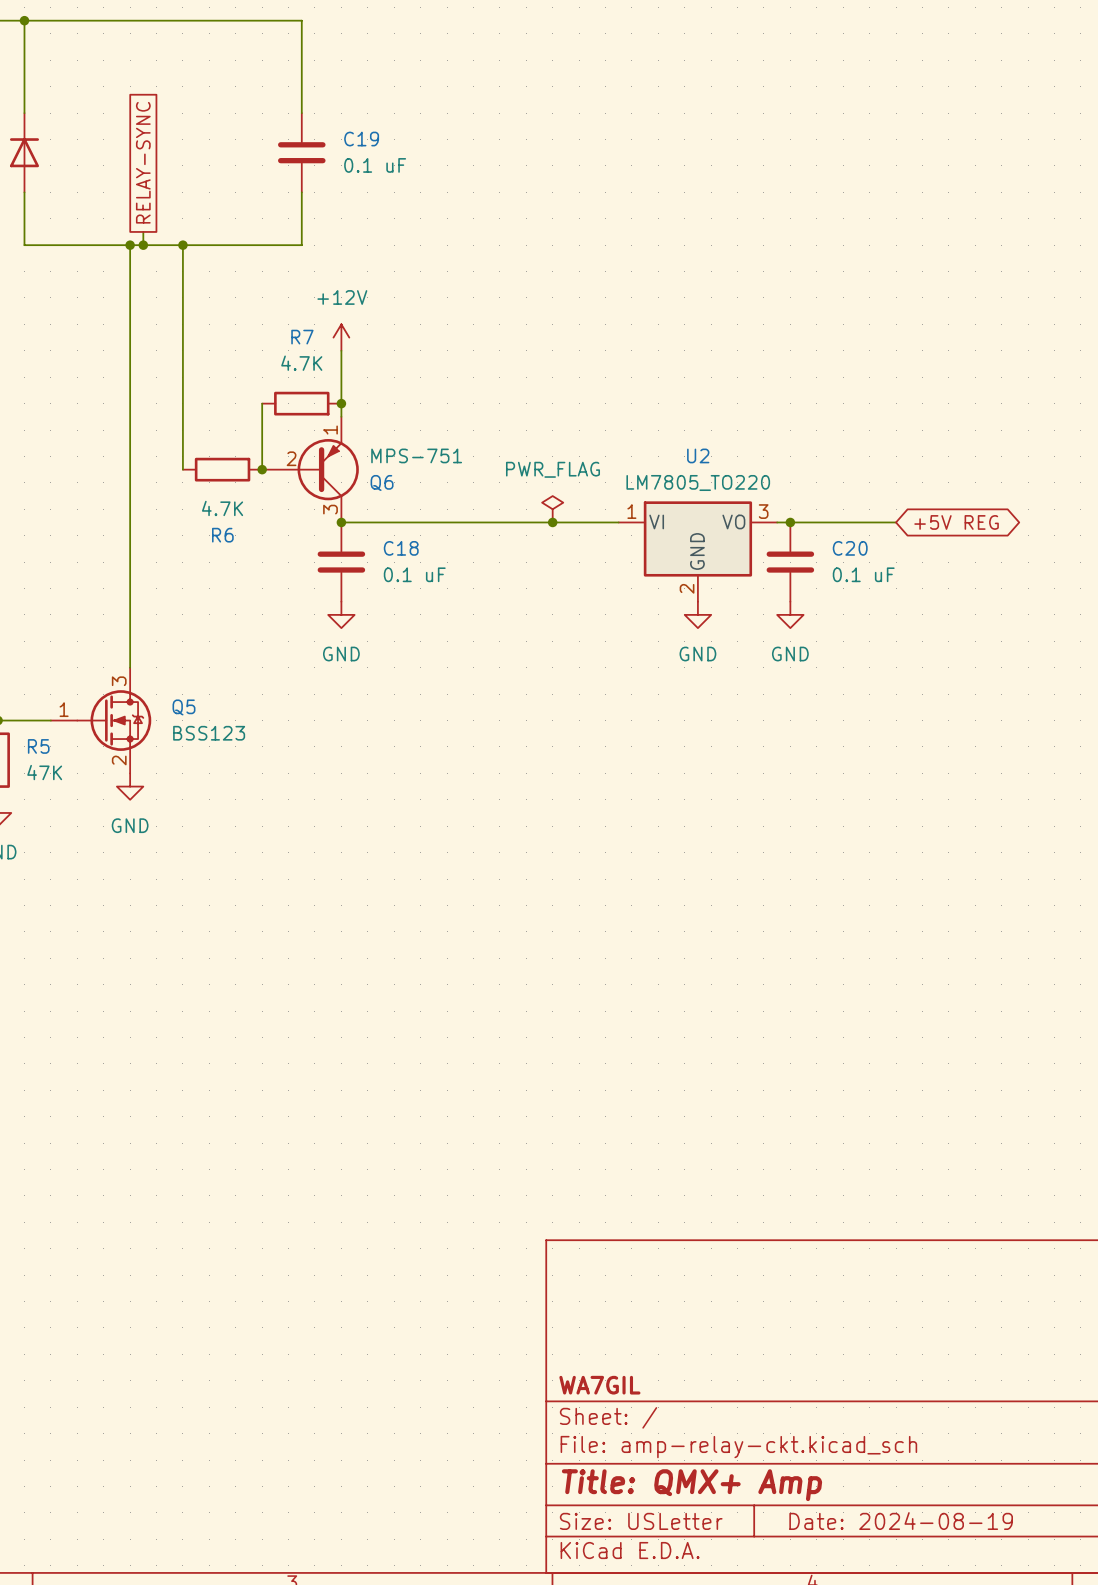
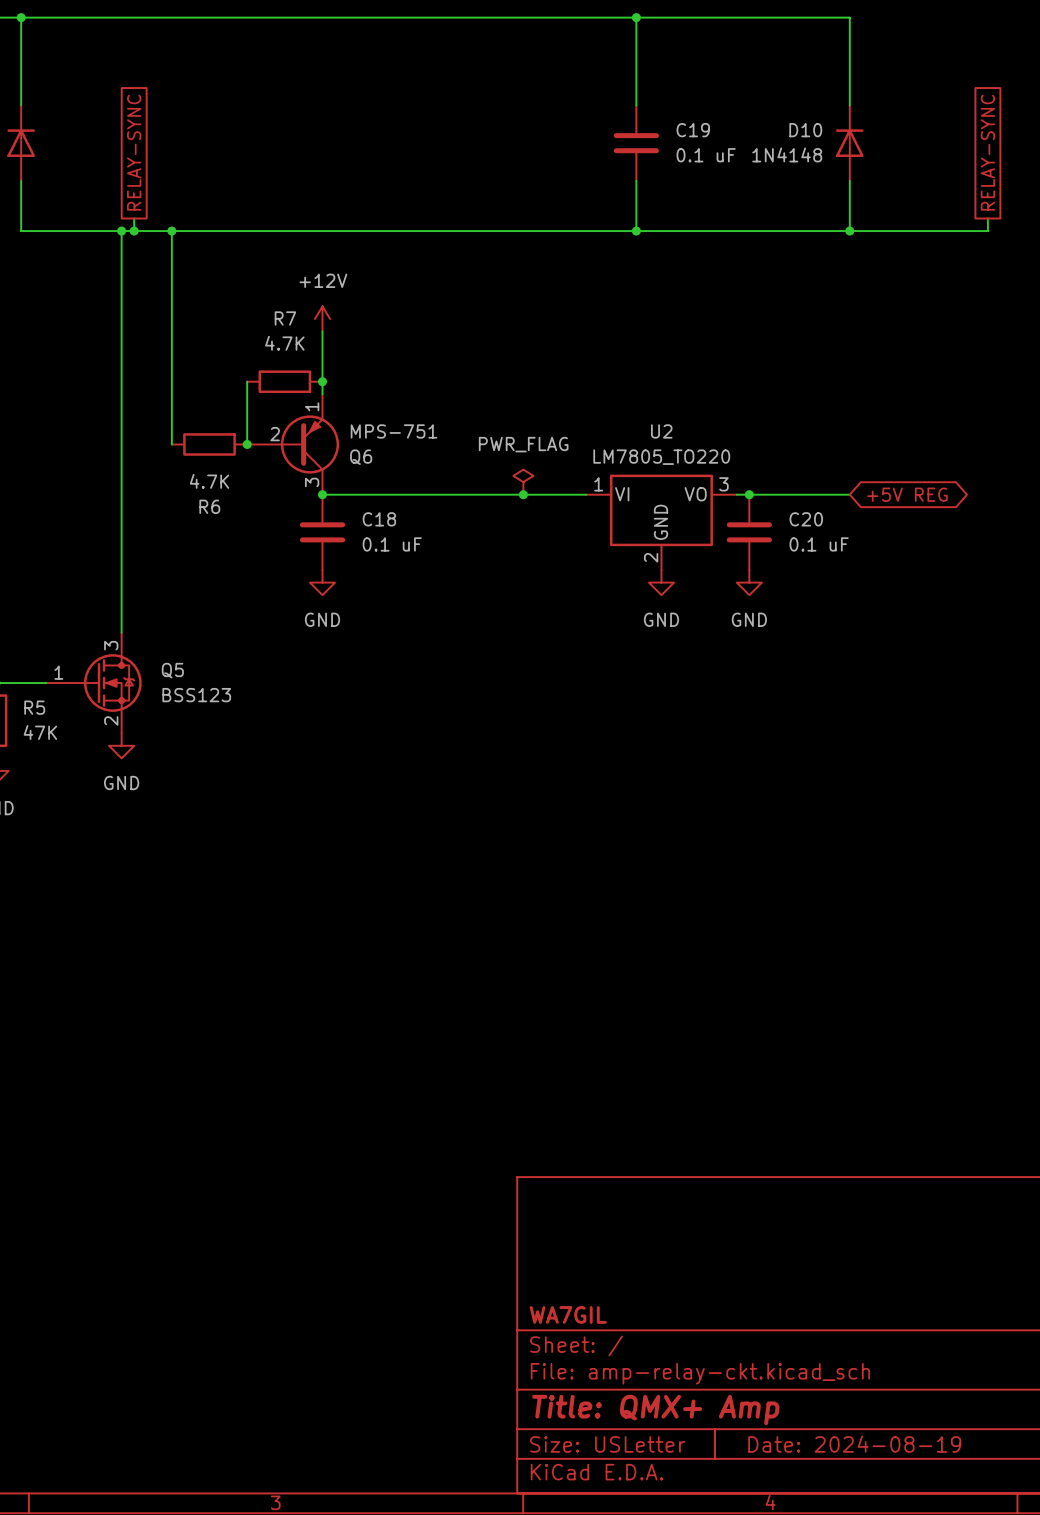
wire: (301, 20) (301, 113) -> (284, 17) (849, 17) (849, 105)
wire: none -> (636, 17) (636, 105)
junction: none -> (636, 17)
C19 position: (301, 152) -> (636, 143)
D10: none -> 1N4148 (849, 143)
global label: none -> RELAY-SYNC (987, 152)
wire: (301, 192) (301, 245) -> (987, 218) (987, 231) (284, 231)
wire: none -> (636, 180) (636, 231)
wire: none -> (849, 180) (849, 231)
junction: none -> (636, 231)
junction: none -> (849, 231)

